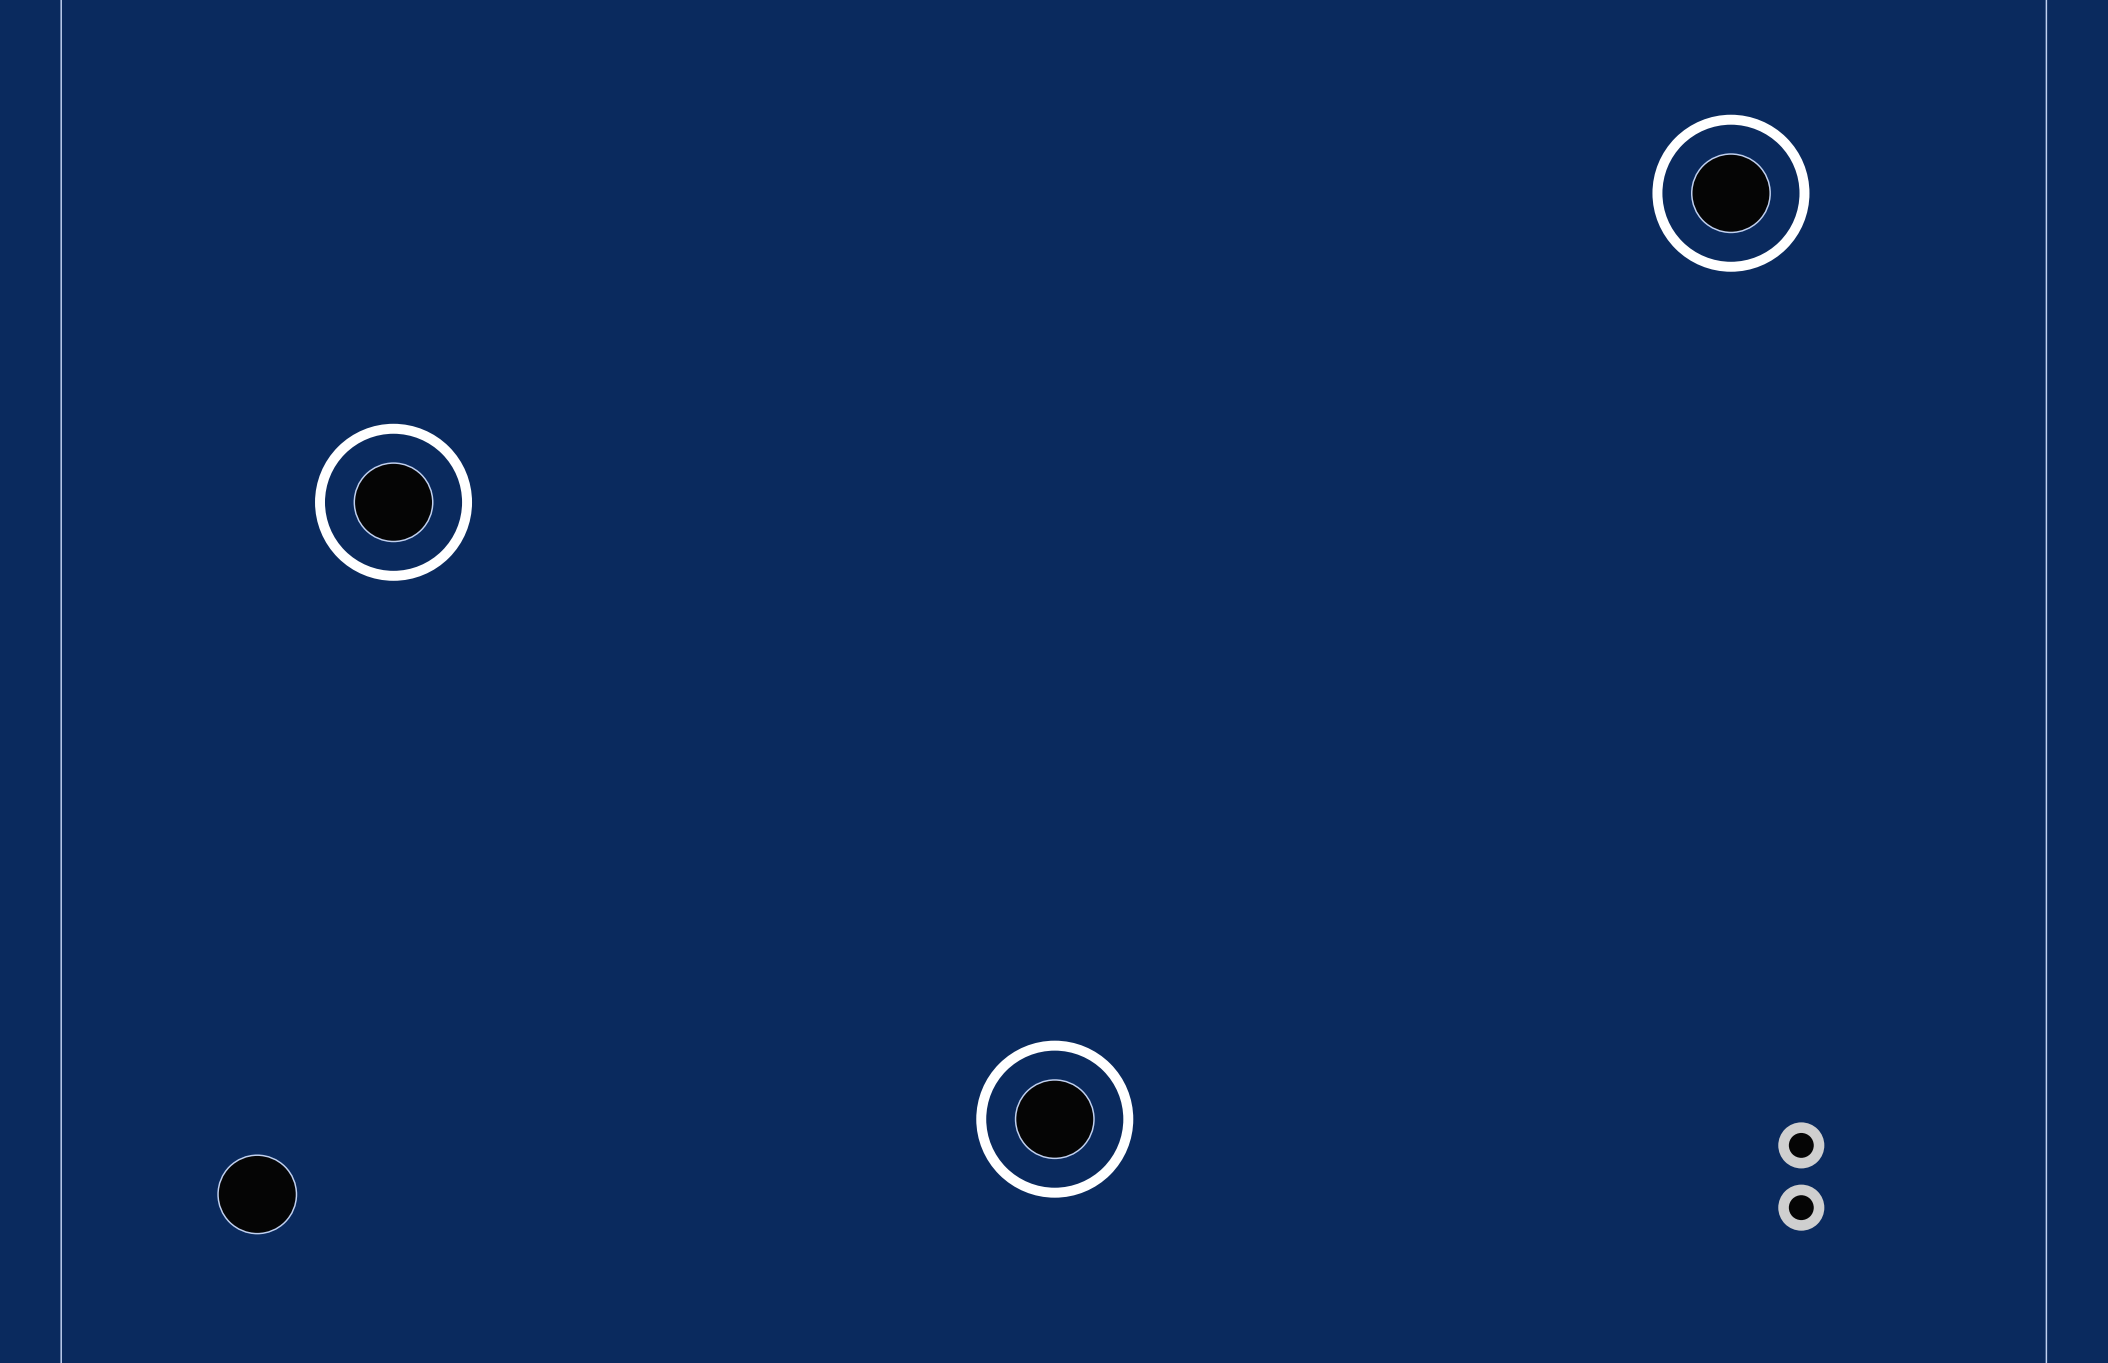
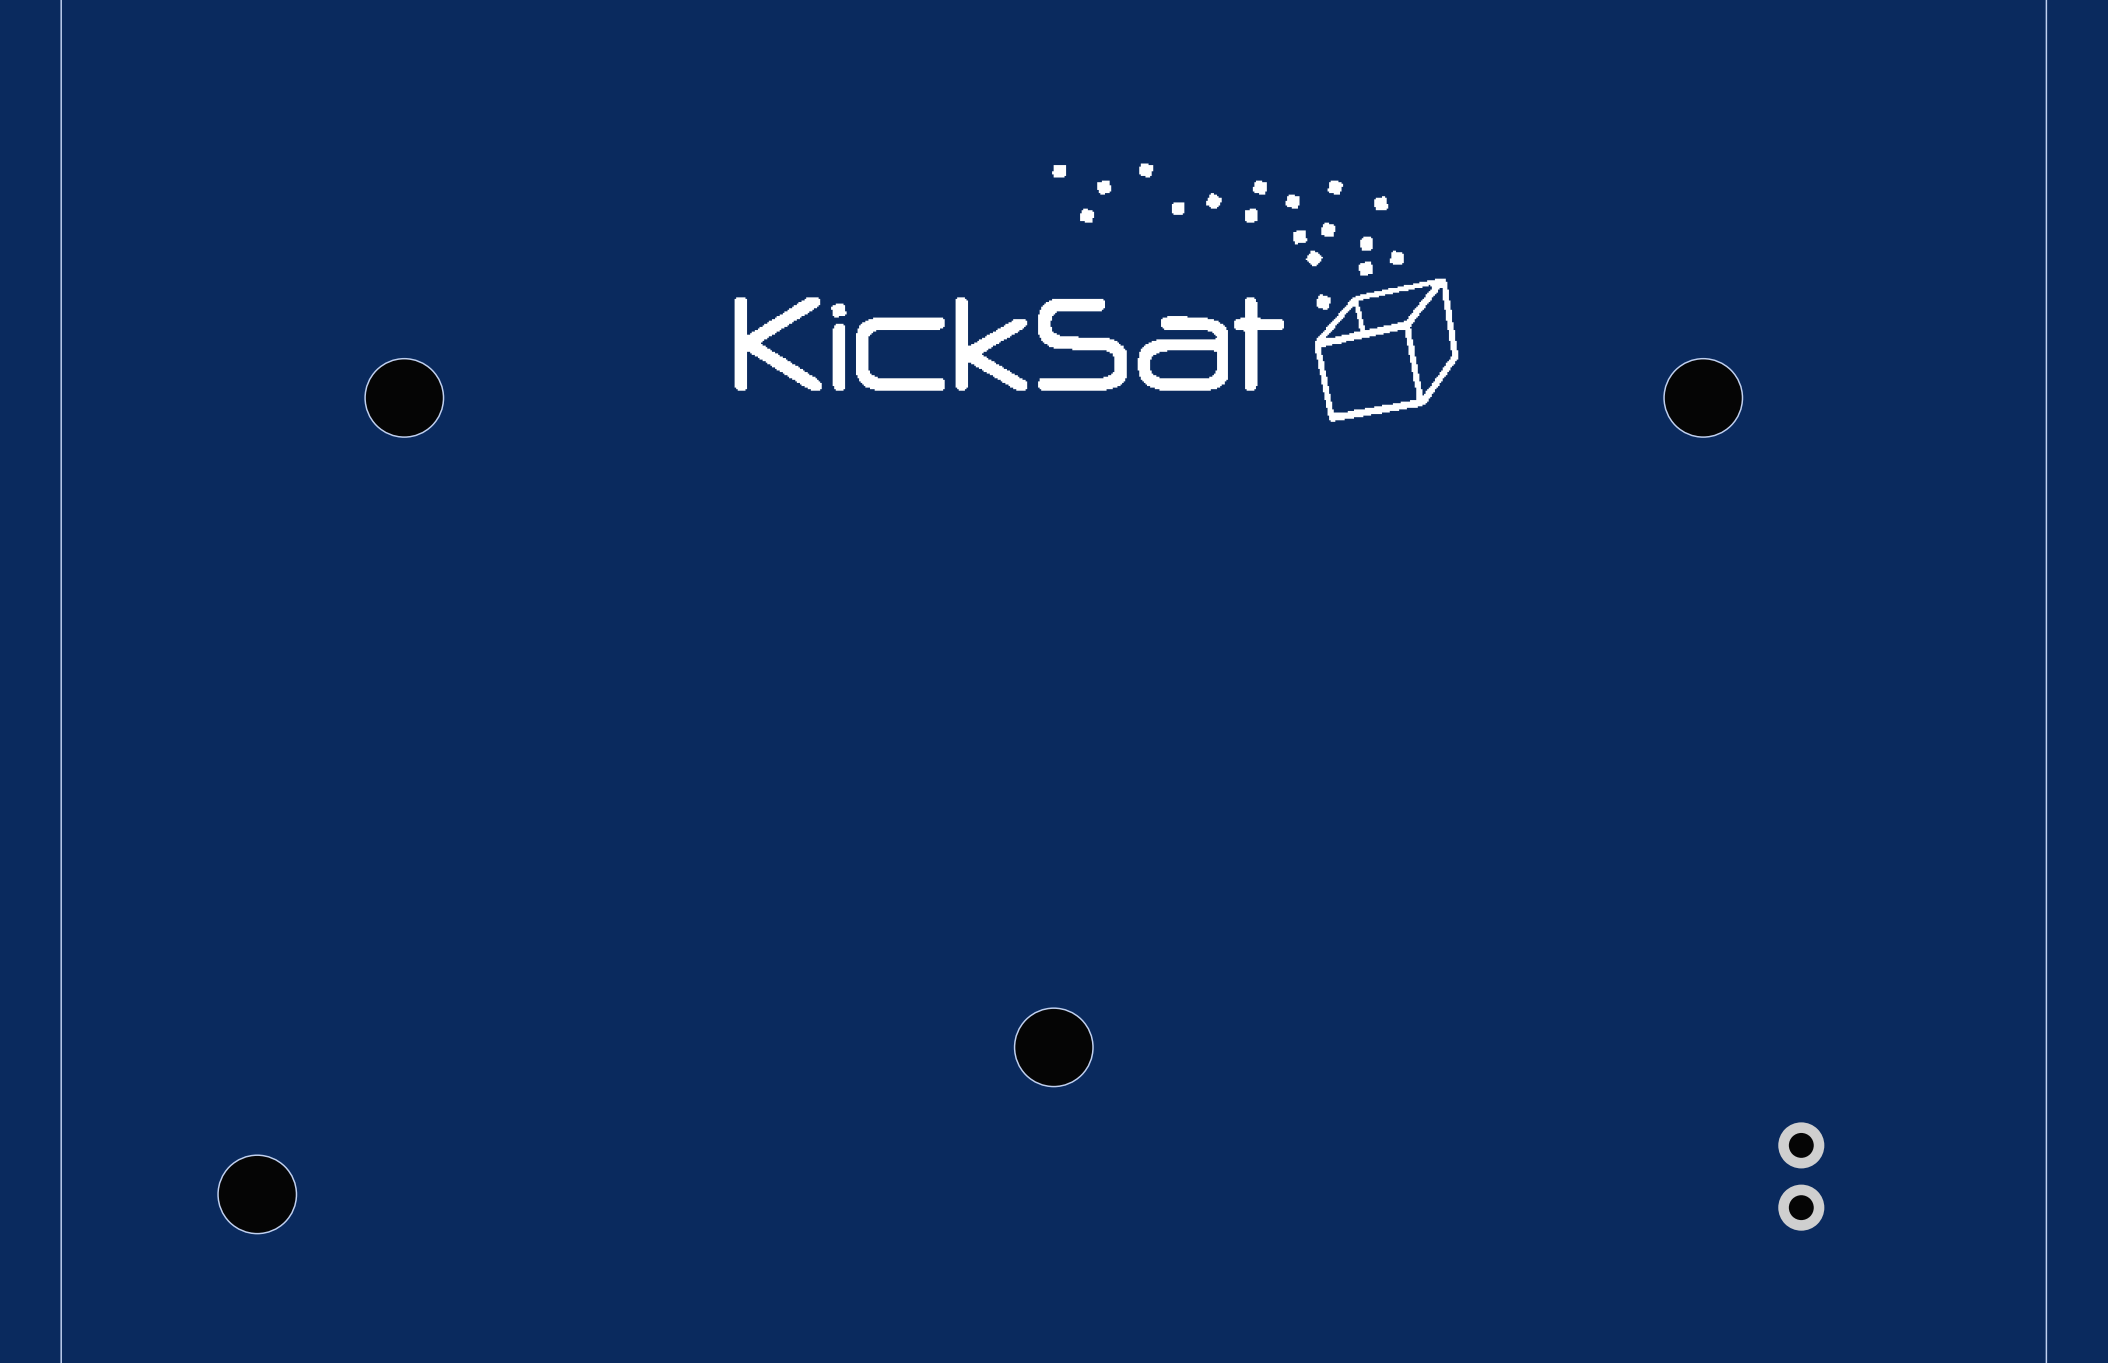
drawing: [1652, 114, 1810, 272] -> none
drawing: none -> [734, 163, 1459, 422]
hole position: (1730, 193) -> (1703, 397)
drawing: [315, 423, 473, 581] -> none
hole position: (393, 502) -> (404, 397)
drawing: [976, 1040, 1134, 1198] -> none
hole position: (1054, 1119) -> (1053, 1047)

